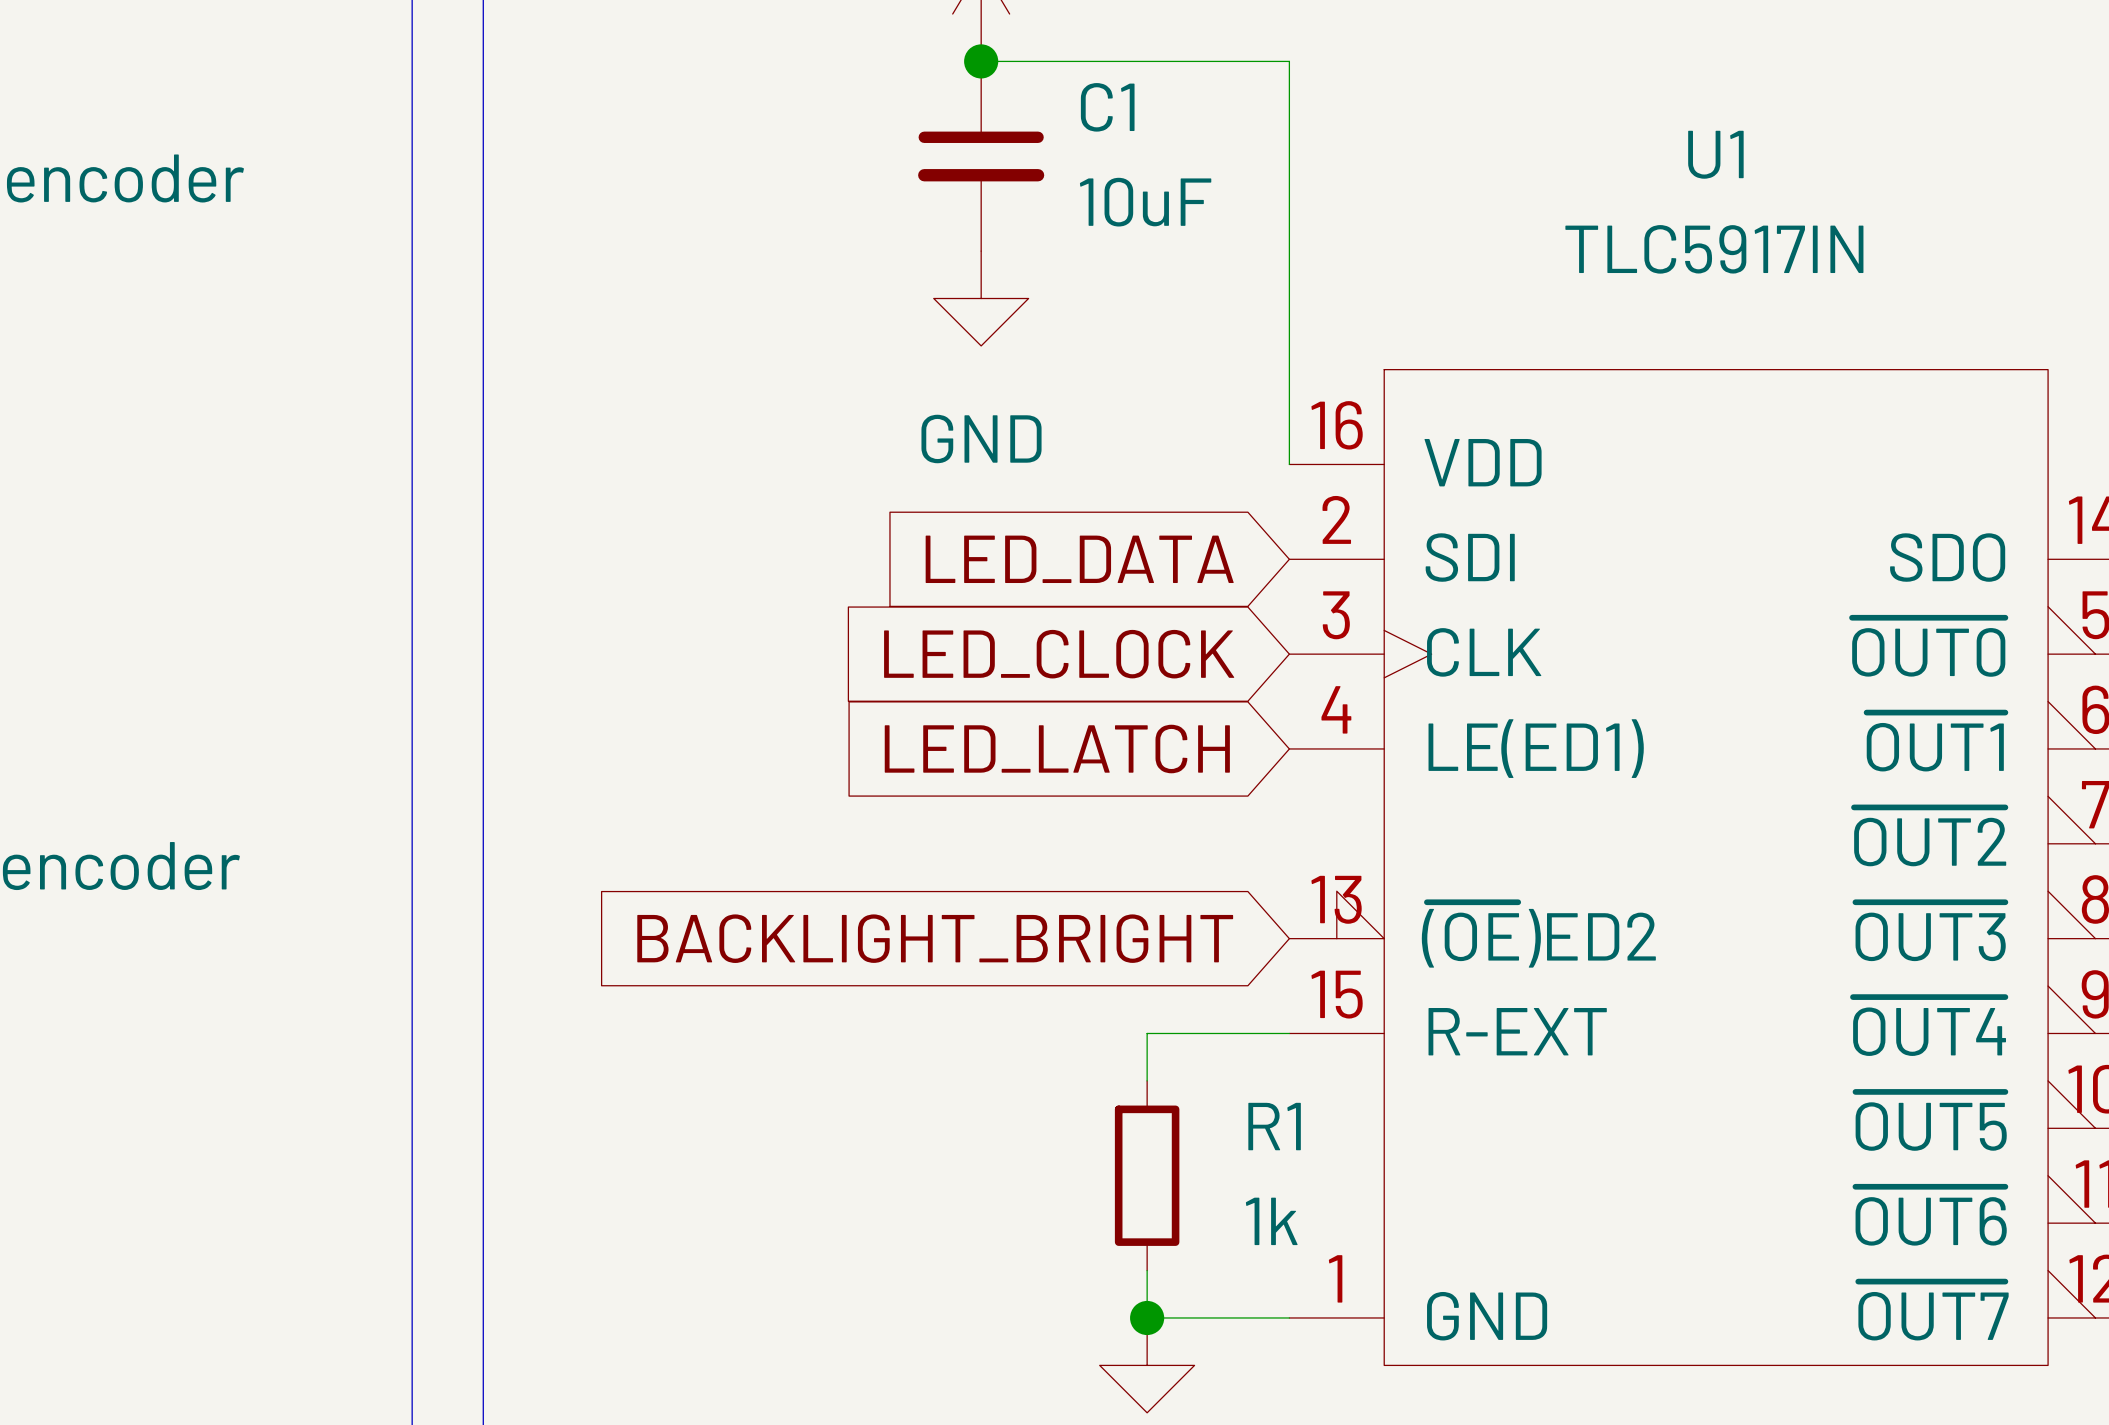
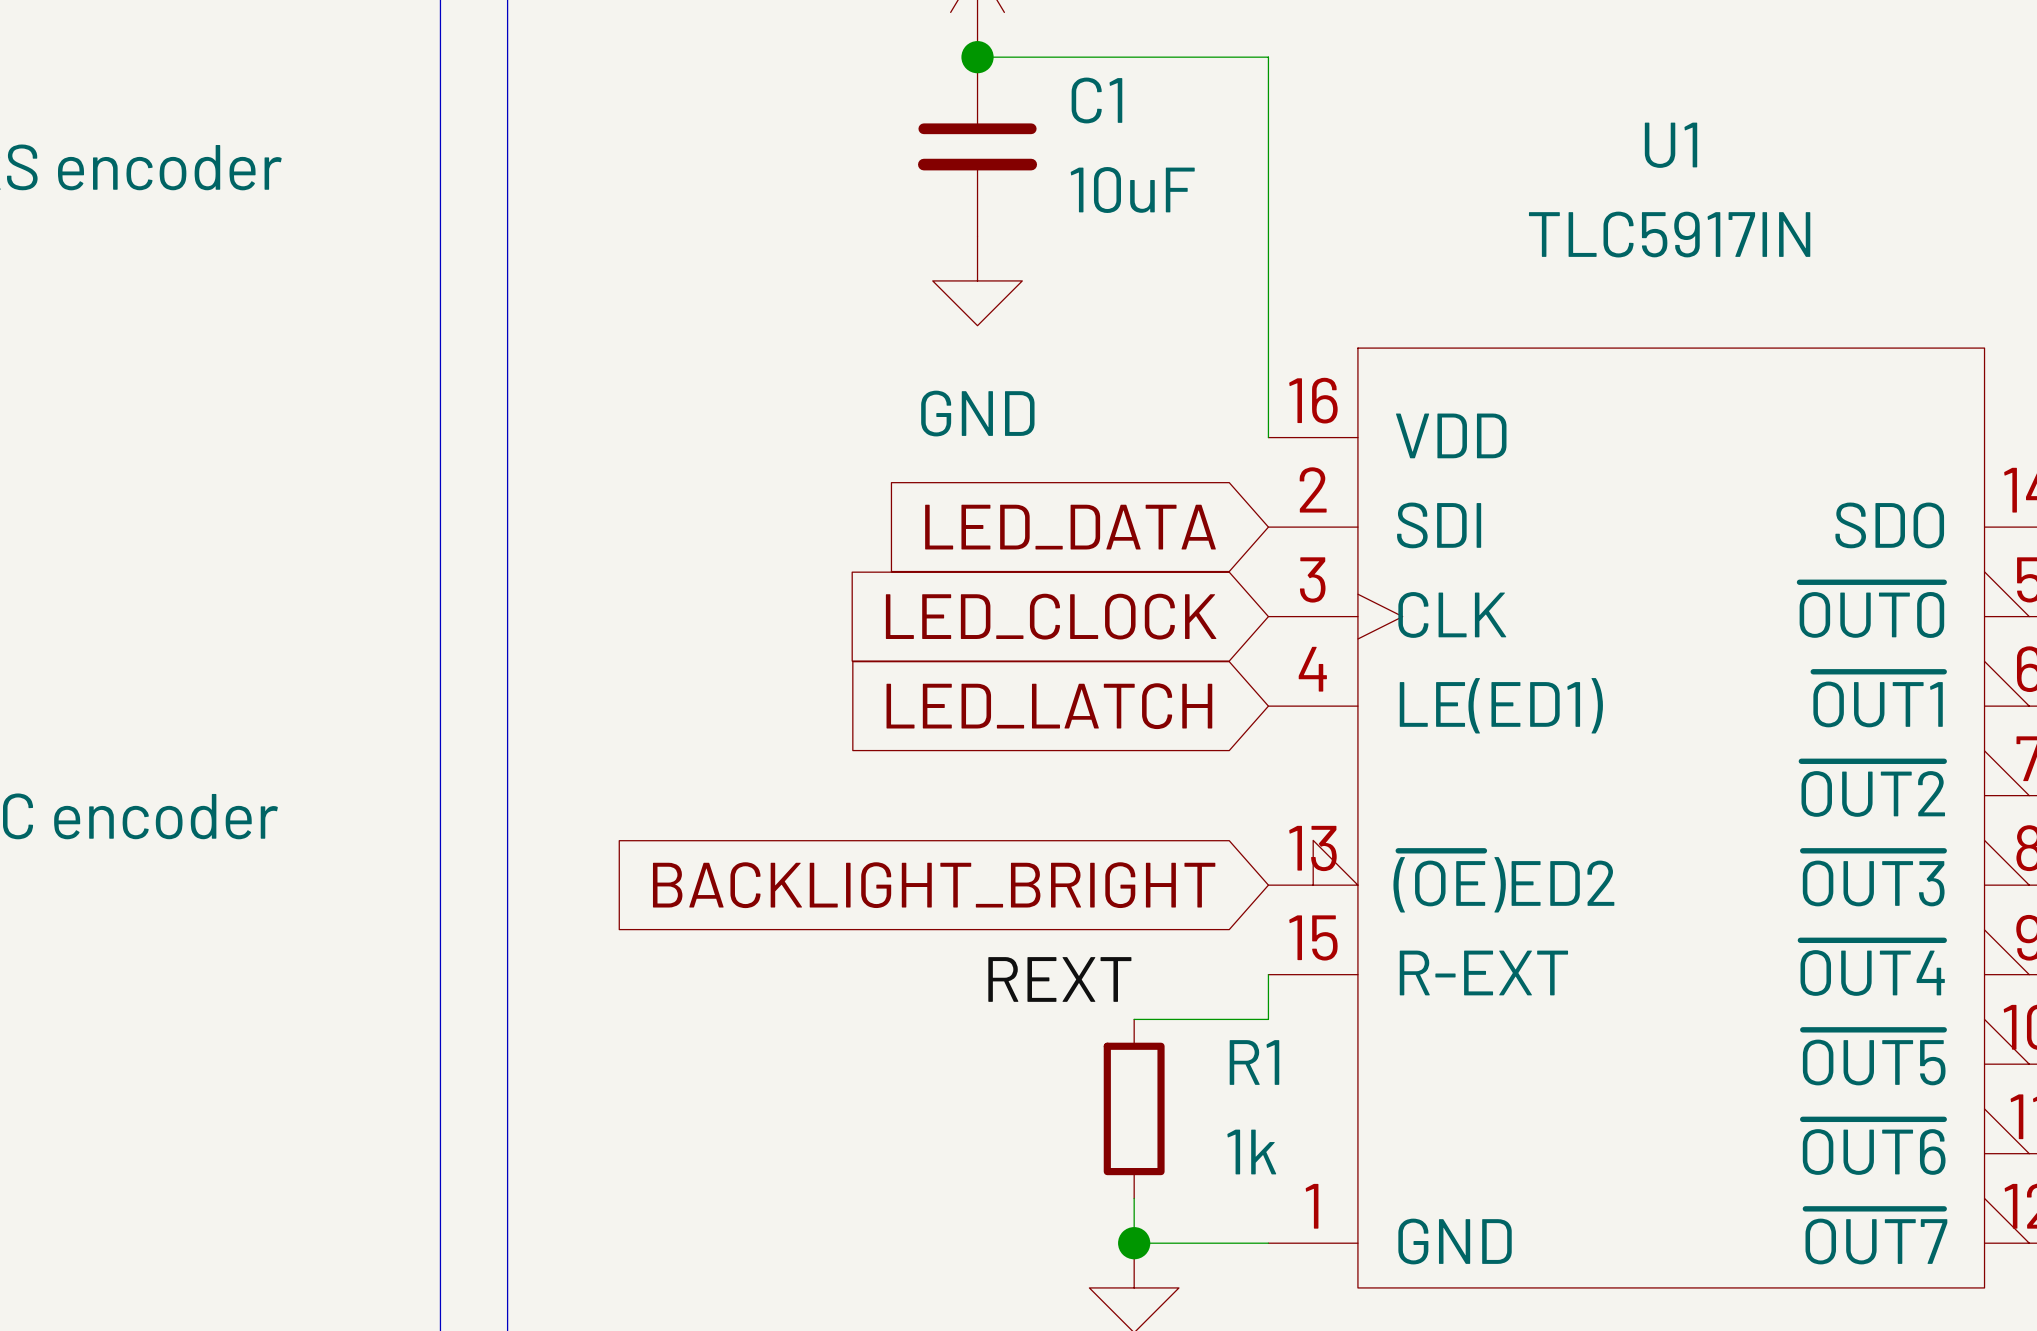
wire: (1289, 1033) (1147, 1033) (1147, 1080) -> (1268, 974) (1268, 1019) (1134, 1019)
label: none -> REXT (1059, 979)

